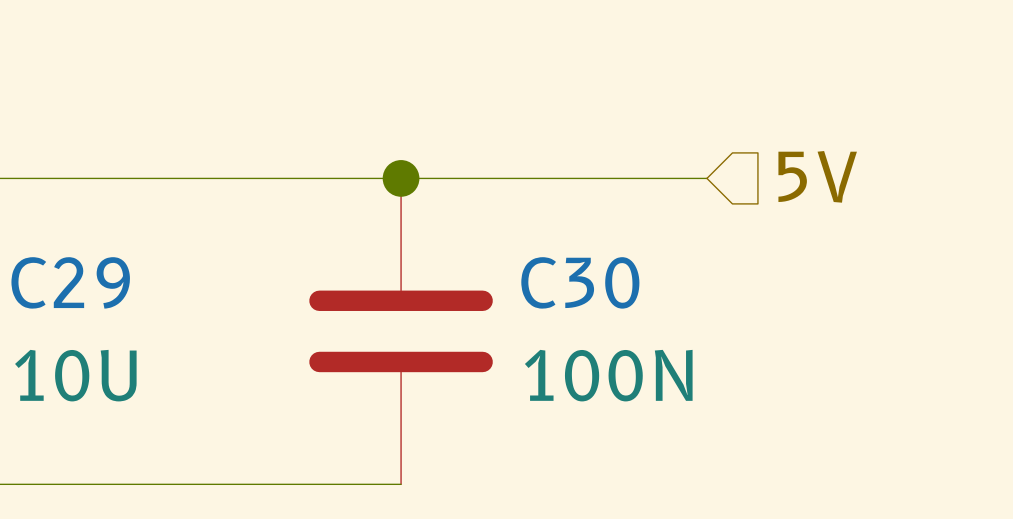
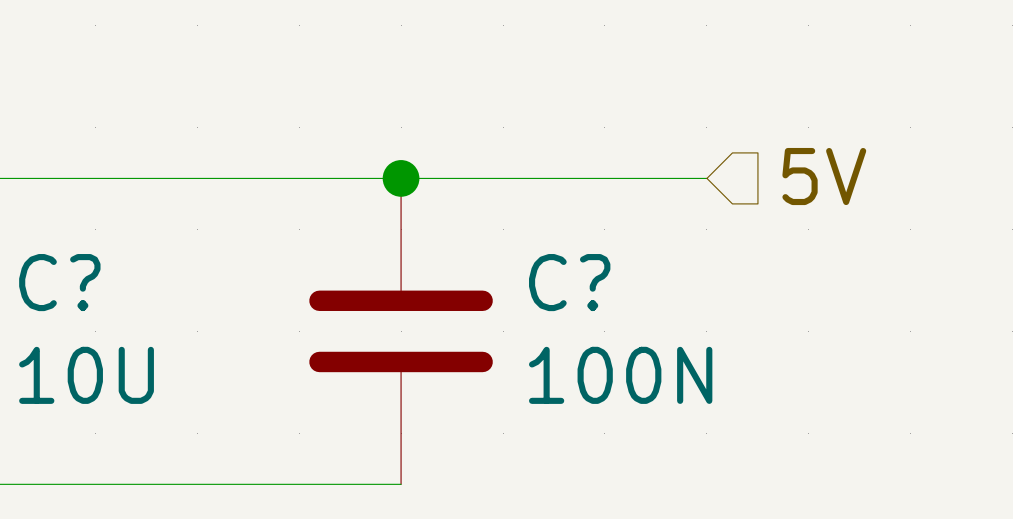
C29 name: C29 (70, 282) -> C? (59, 282)
C30 name: C30 (580, 282) -> C? (569, 282)

